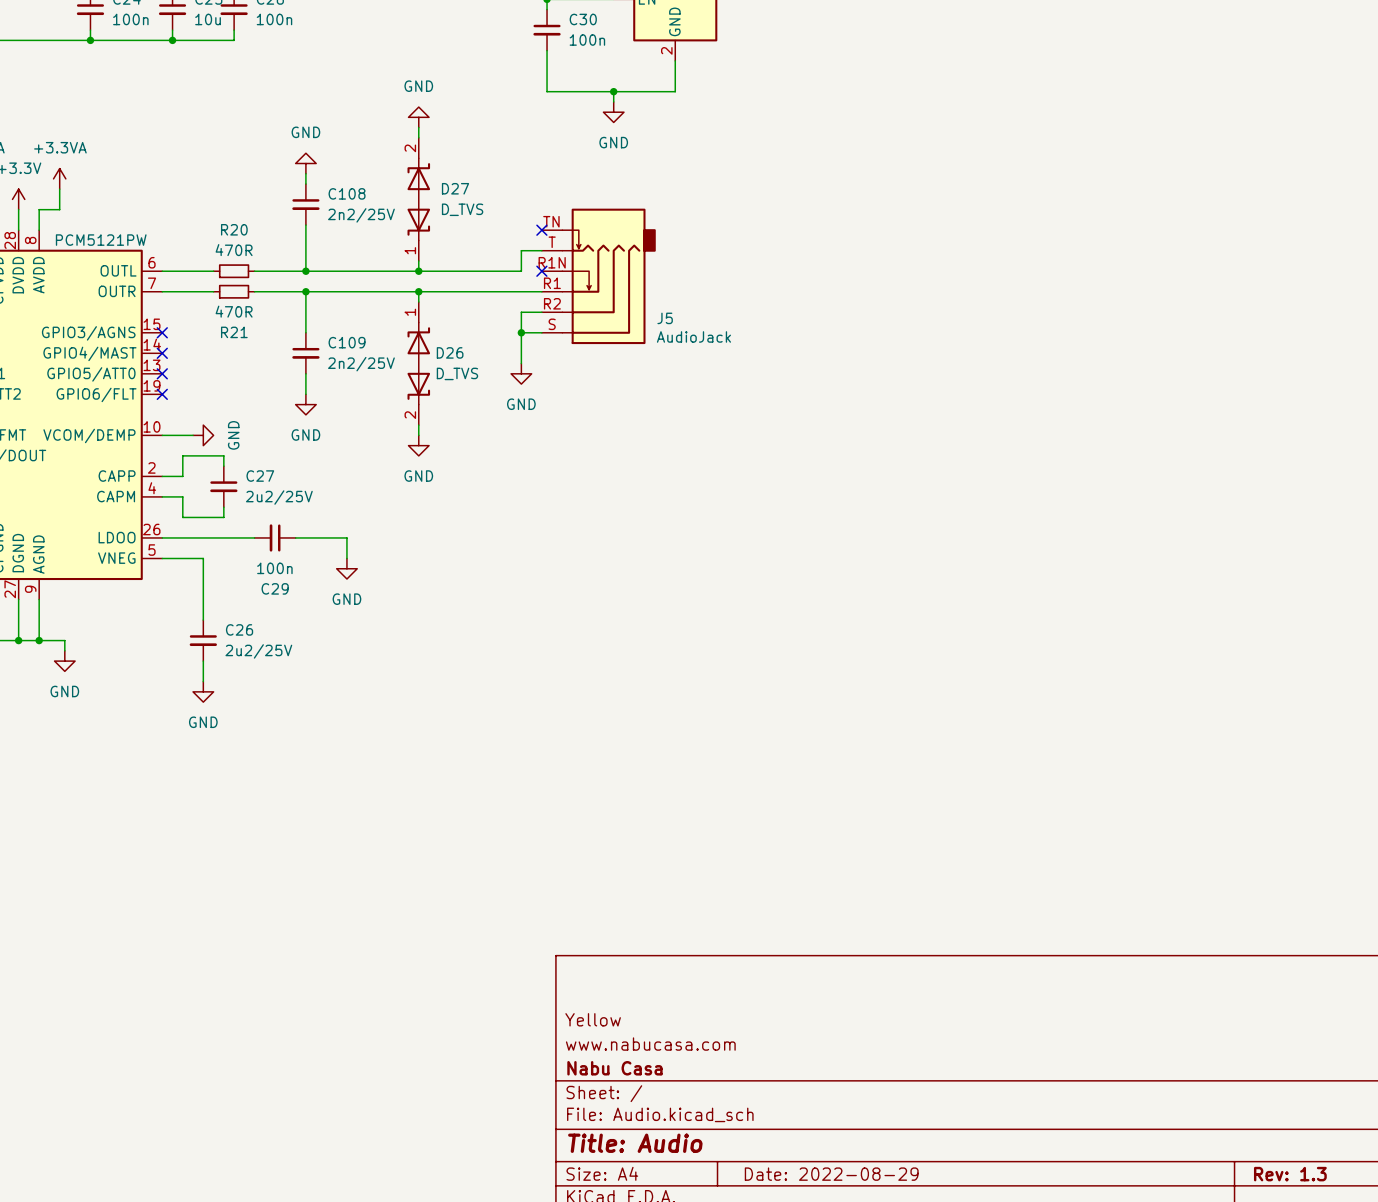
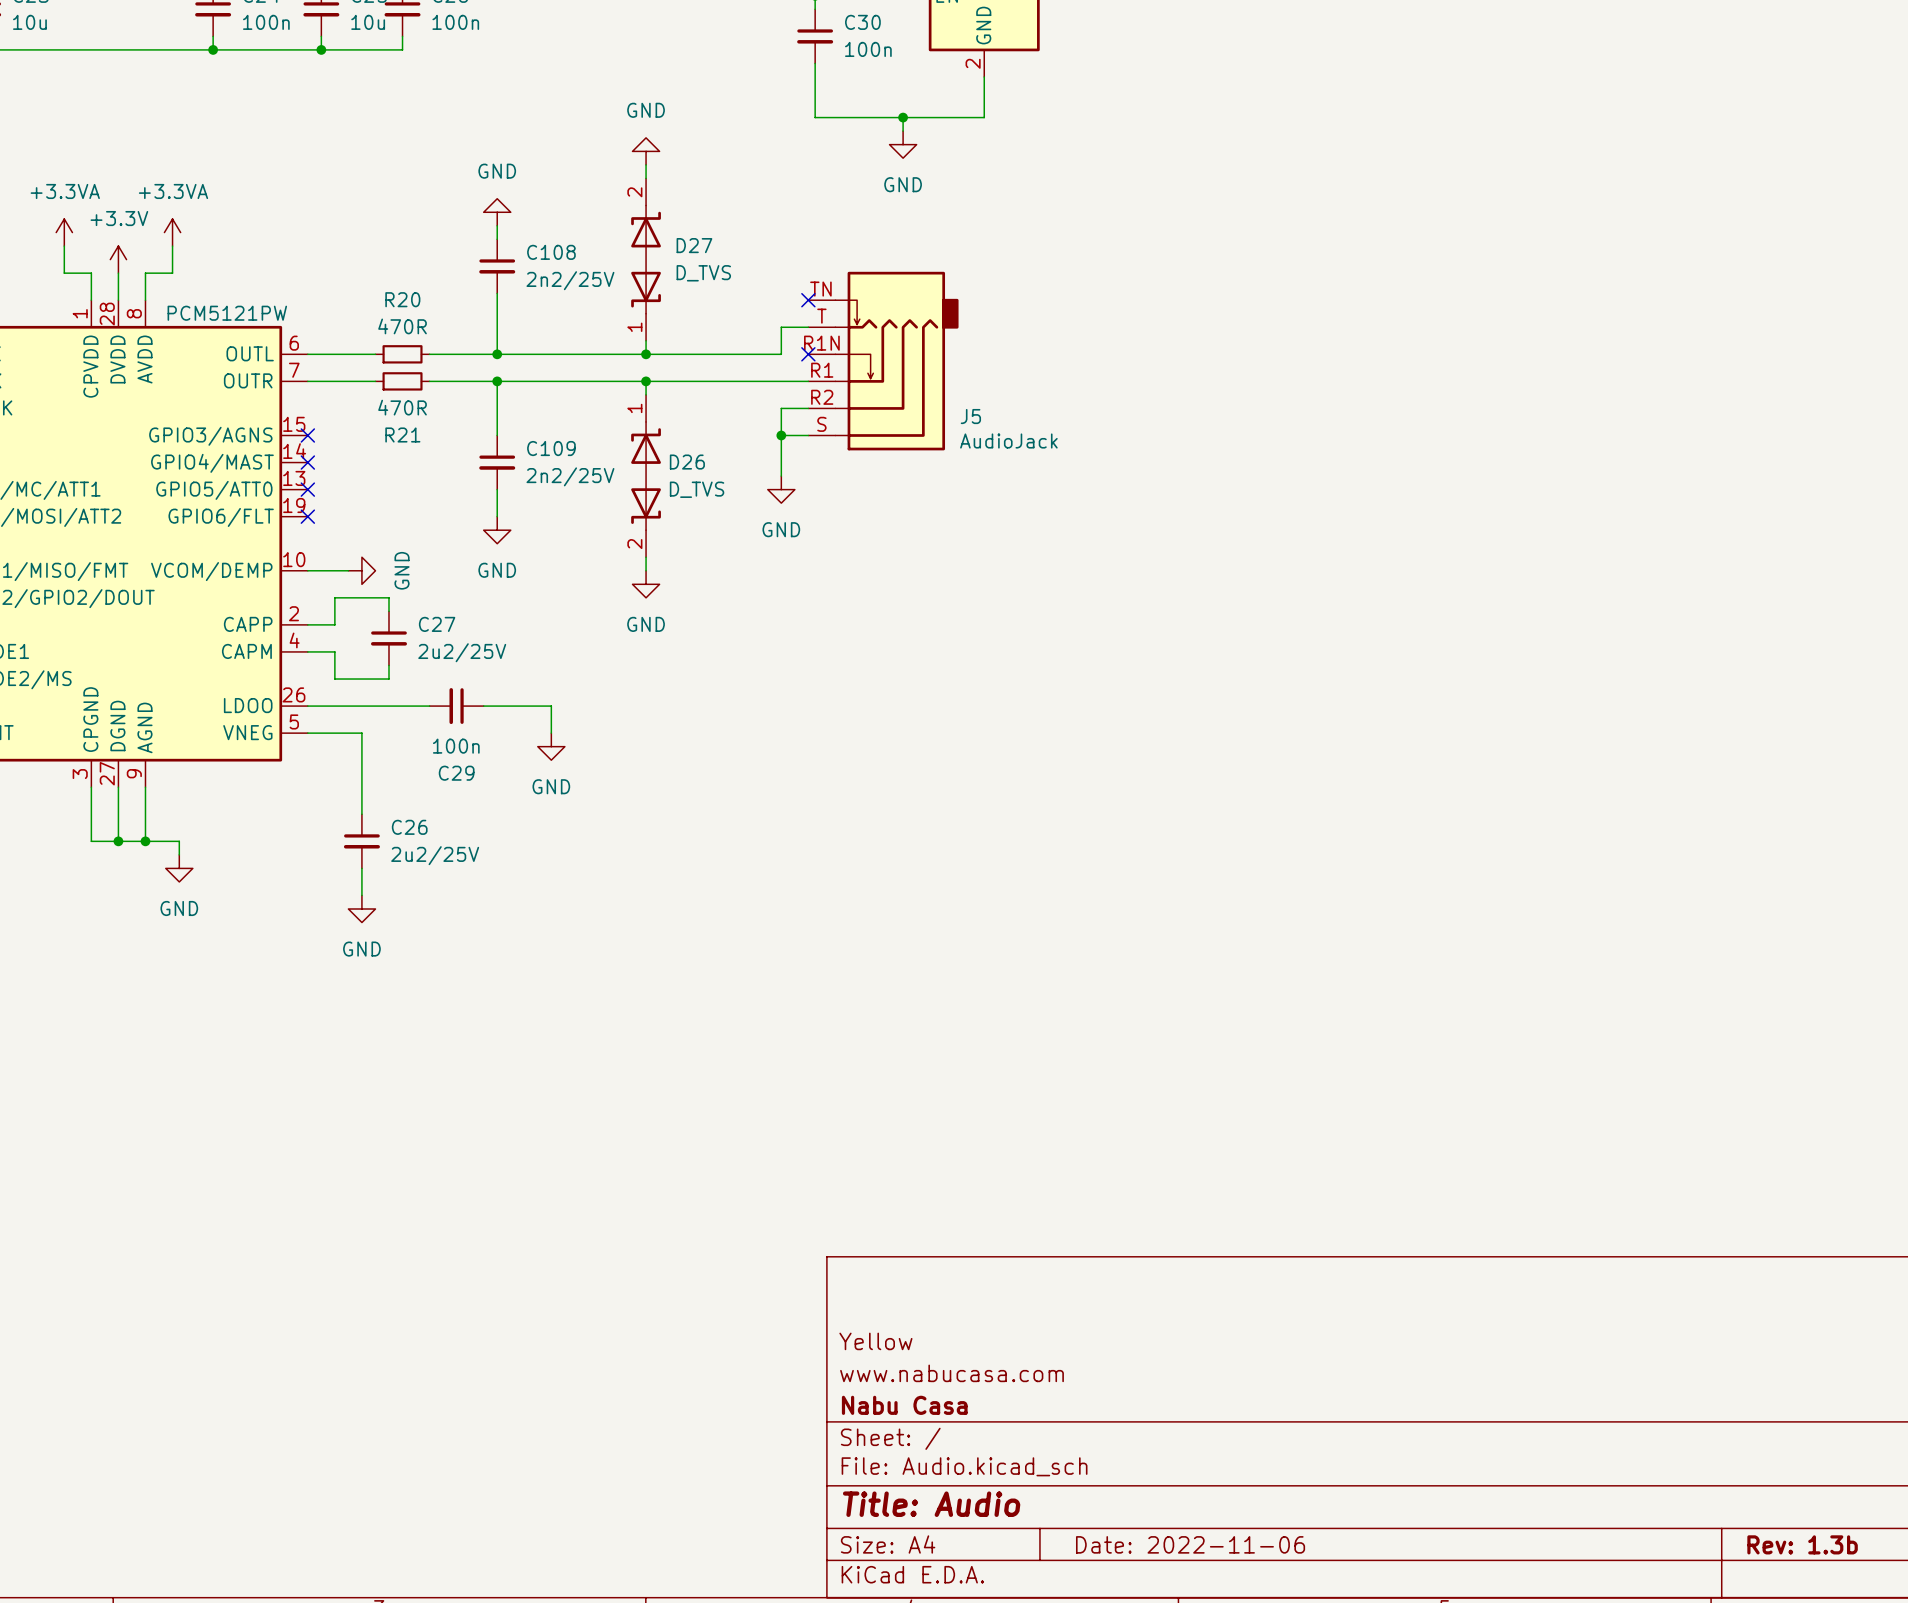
title block: Date: 2022-08-29 (831, 1174) -> Date: 2022-11-06 (1190, 1544)
title block: Rev: 1.3 (1290, 1174) -> Rev: 1.3b (1802, 1544)

